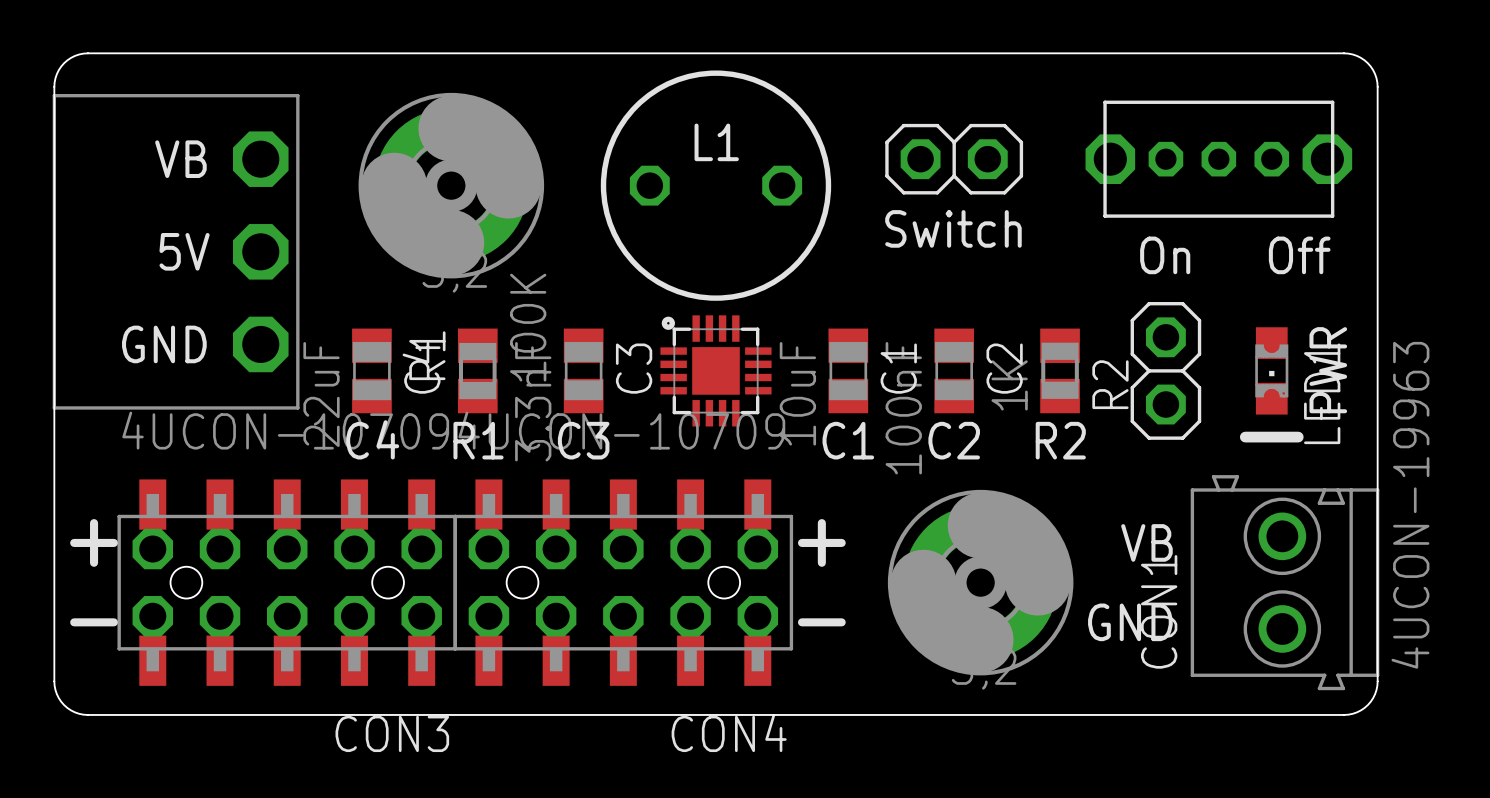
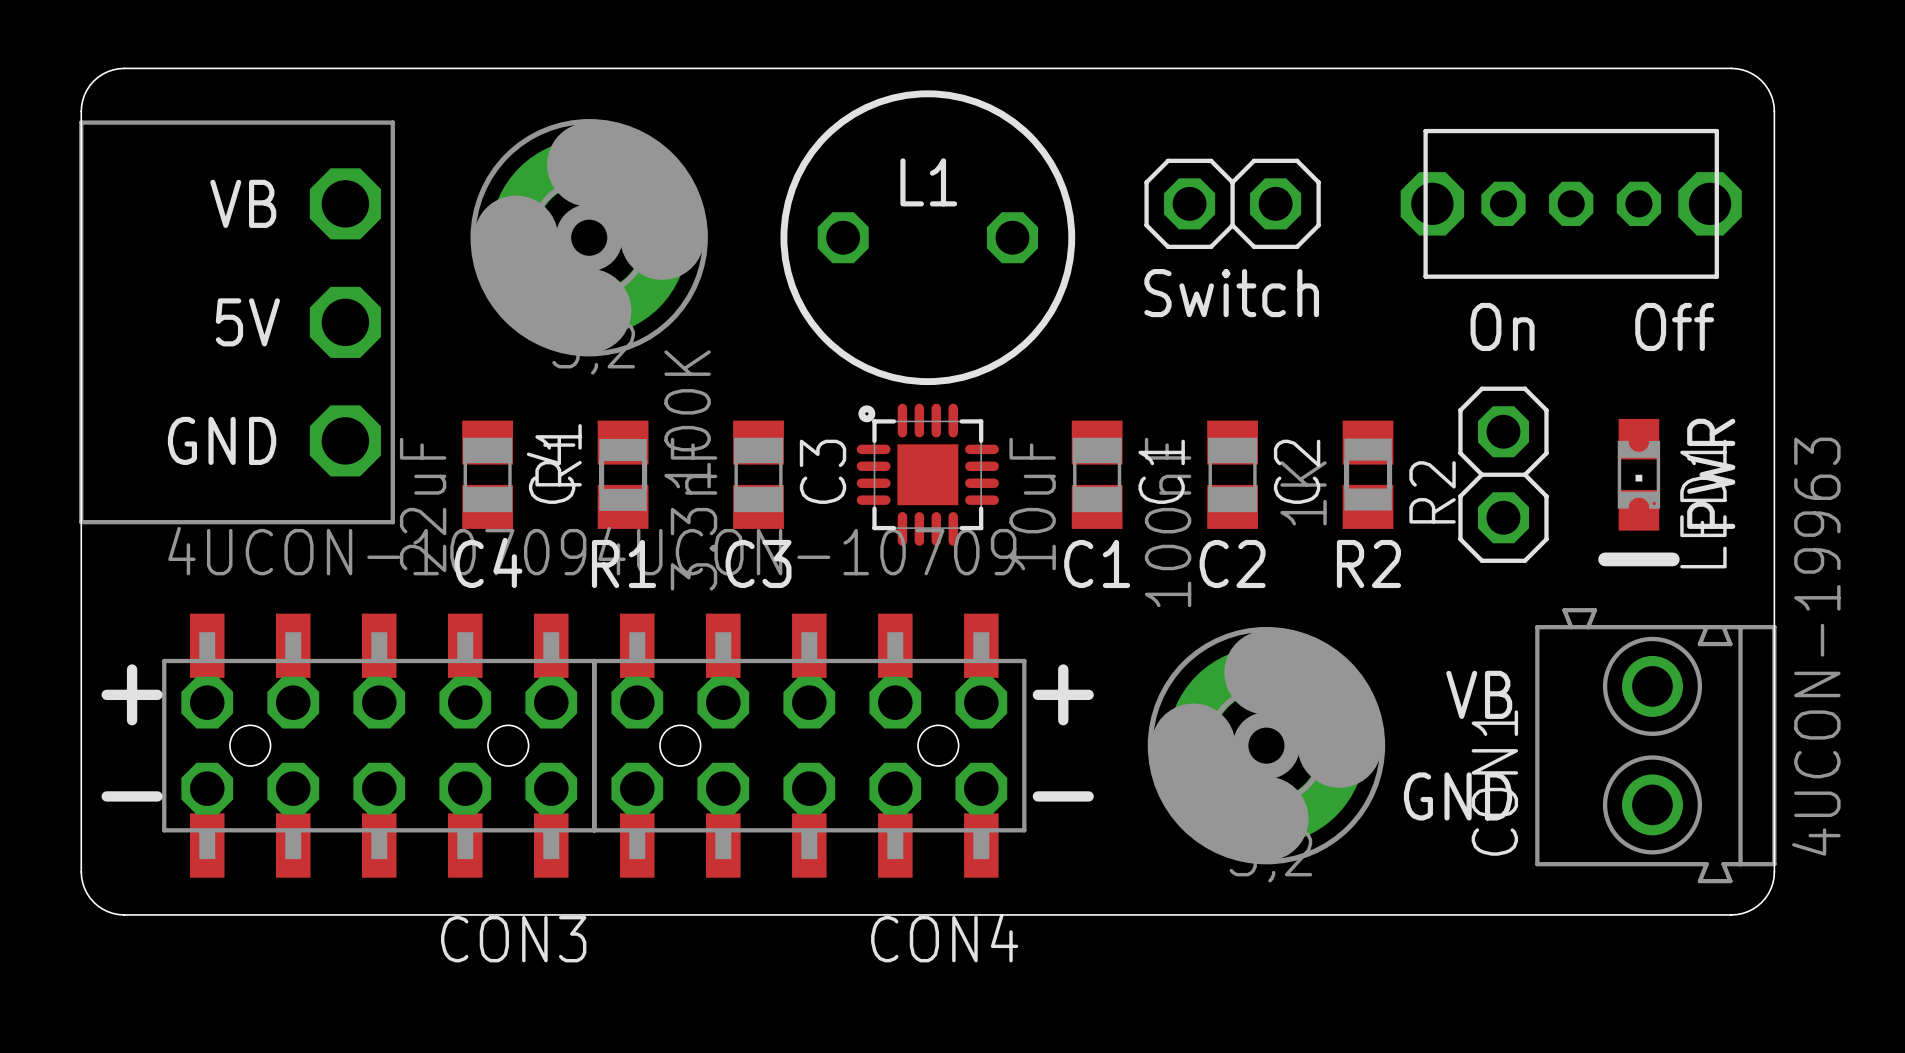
part footprint: [660, 315, 772, 427] -> [856, 403, 999, 546]

